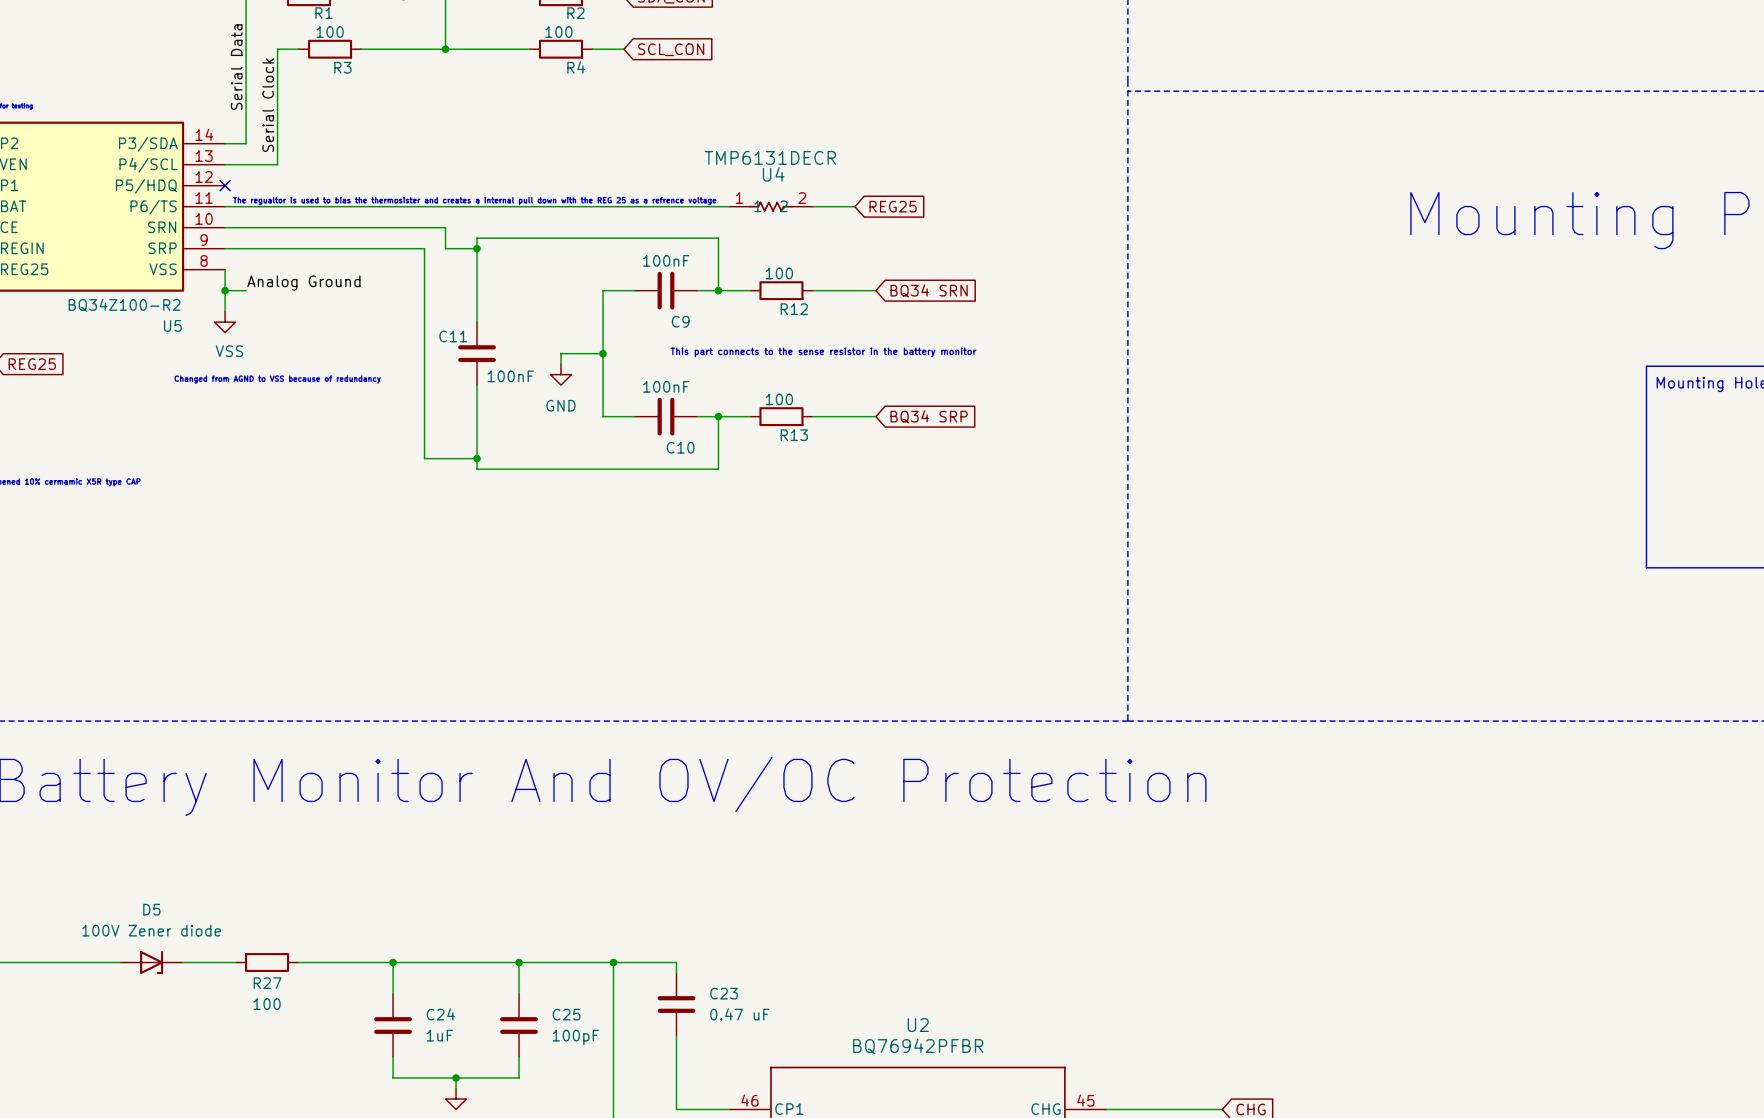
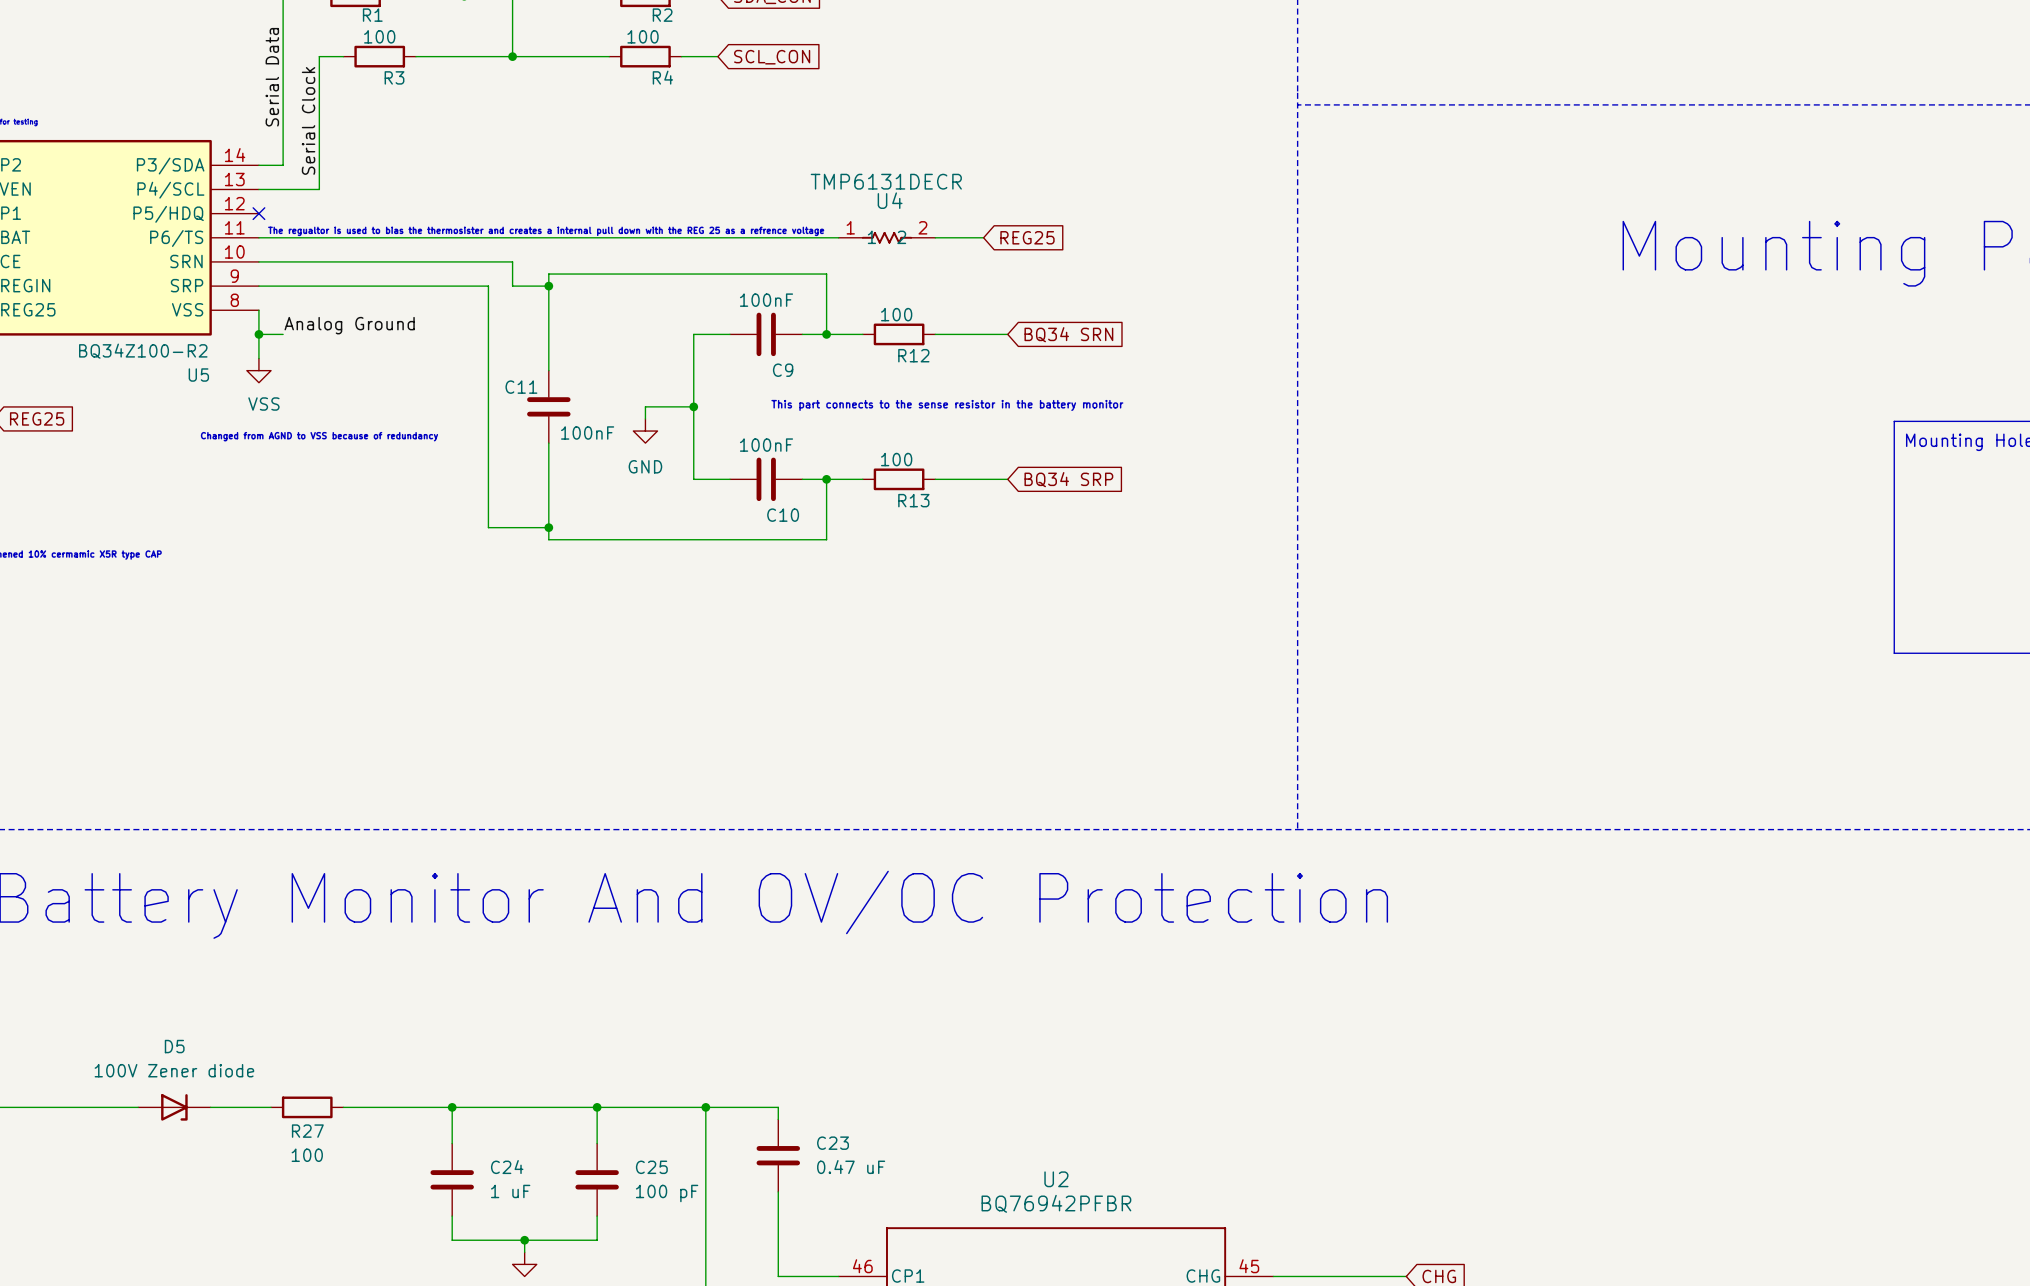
C24 value: 1uF (439, 1035) -> 1 uF (510, 1191)
C25 value: 100pF (575, 1037) -> 100 pF (667, 1193)

